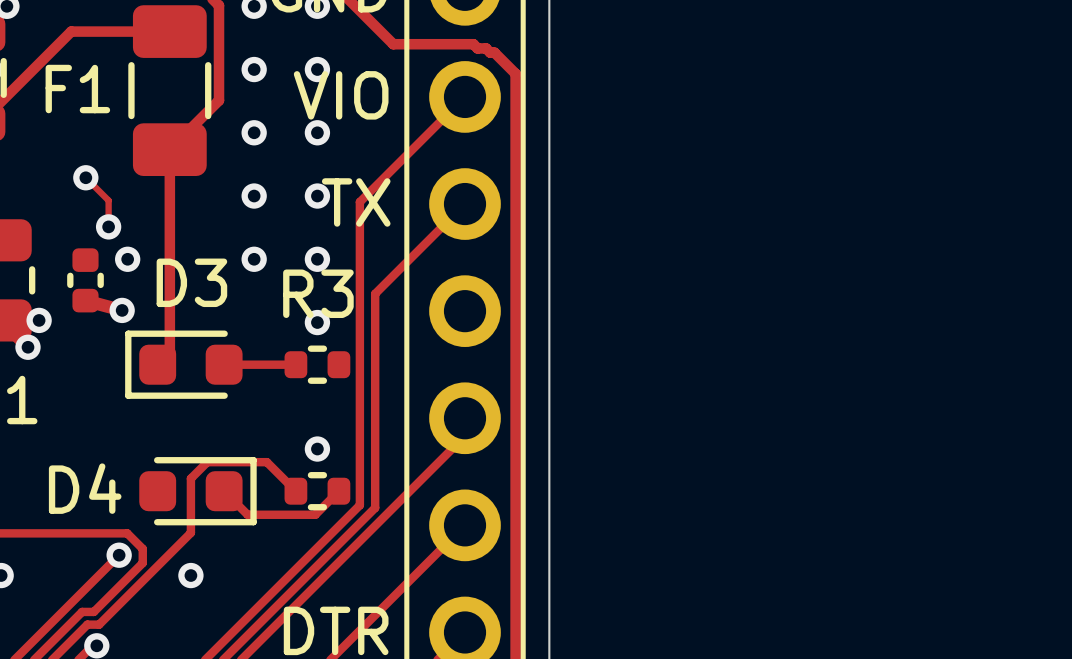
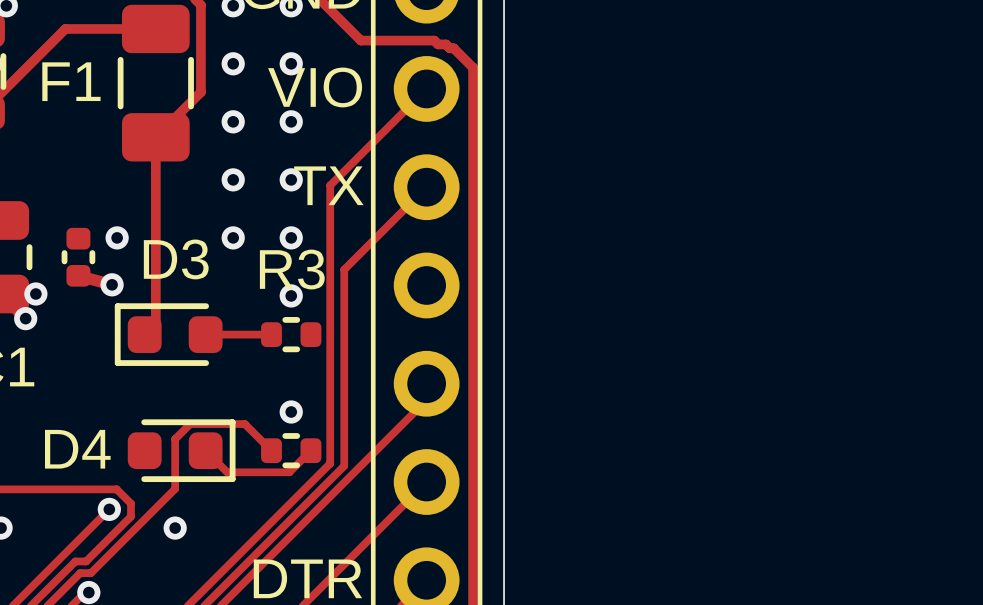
track: (85, 177) (108, 200) (108, 226) -> none
via: (85, 177) -> none
via: (108, 226) -> none

